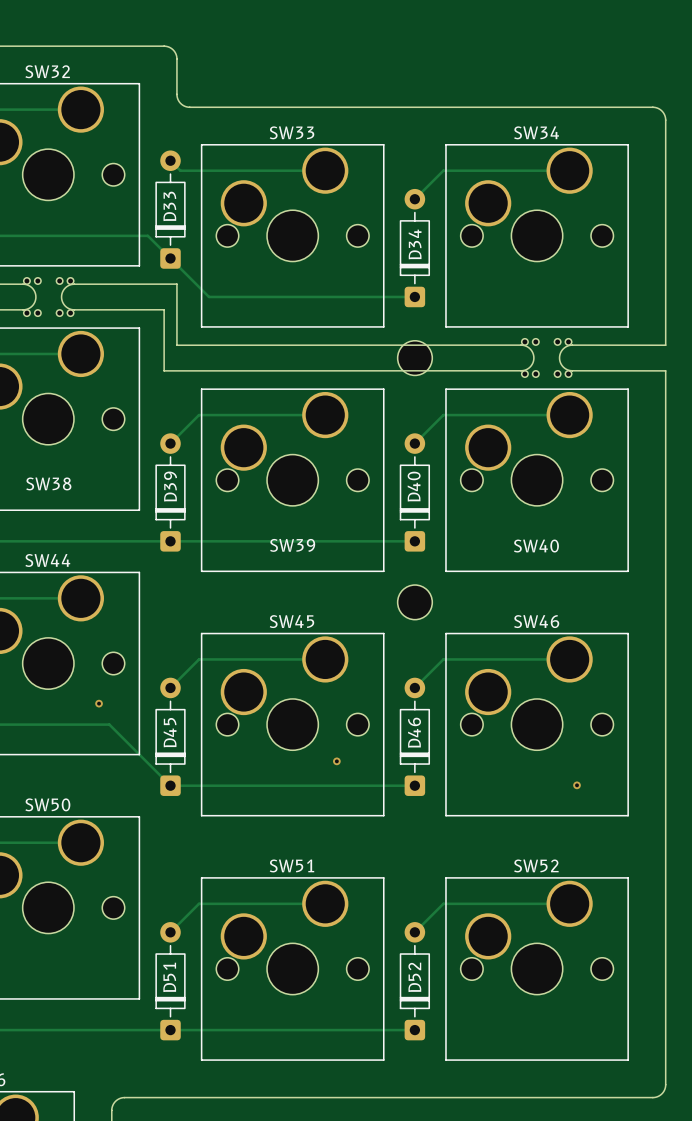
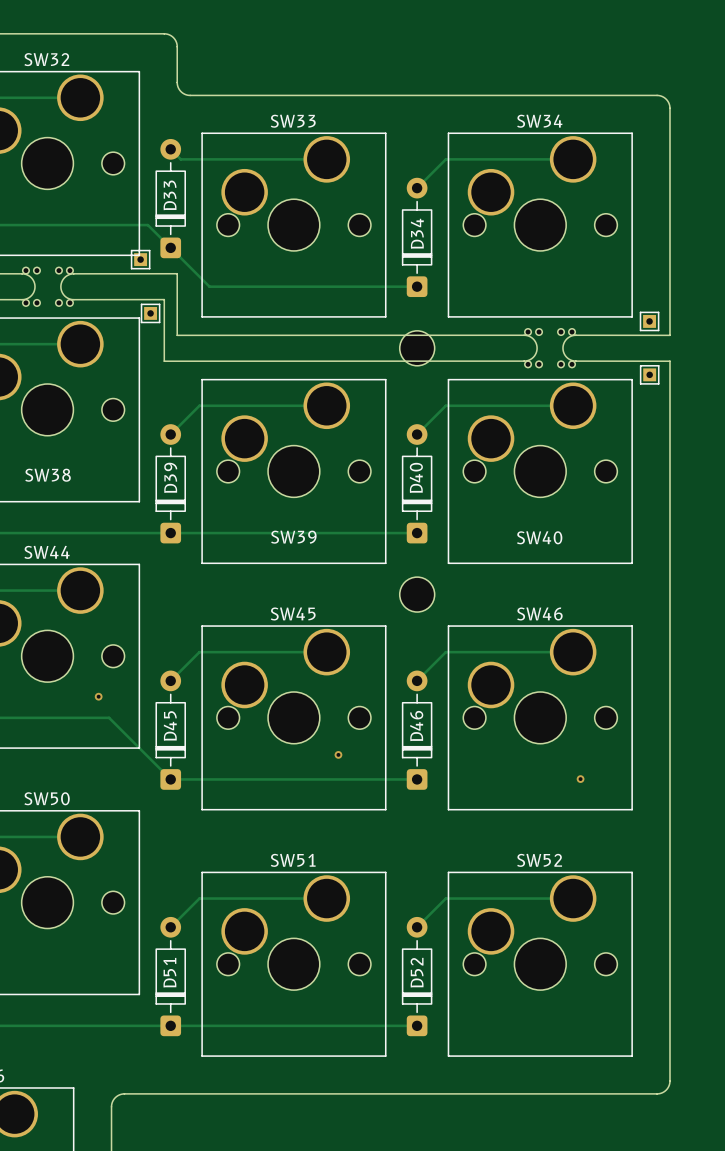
part: none -> (140, 259)
part: none -> (150, 313)
part: none -> (649, 321)
part: none -> (649, 374)

